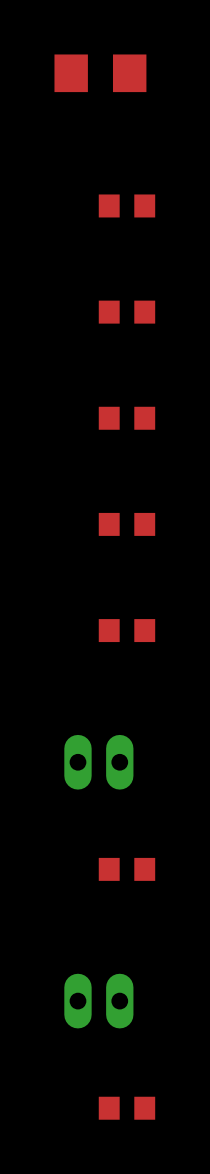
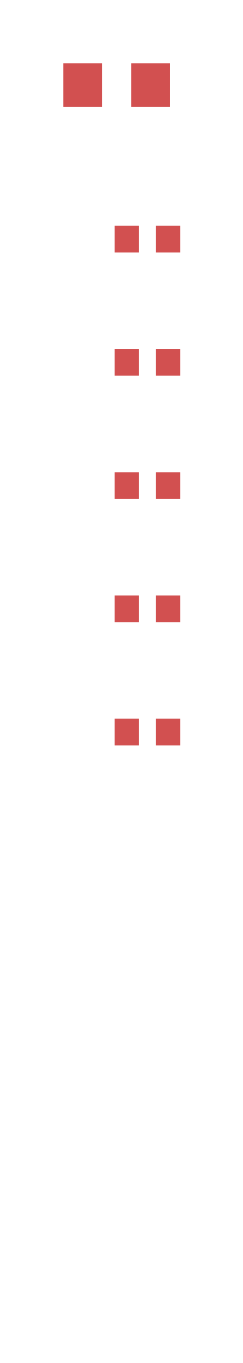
part: (98, 762) -> none
part: (126, 869) -> none
part: (98, 1001) -> none
part: (126, 1108) -> none

